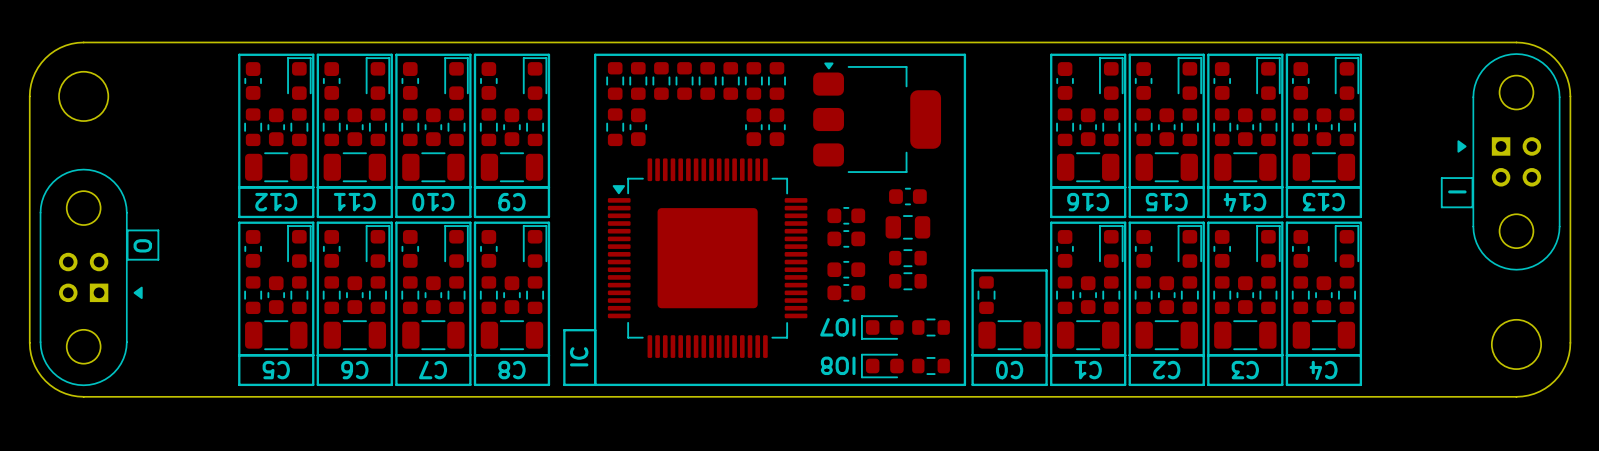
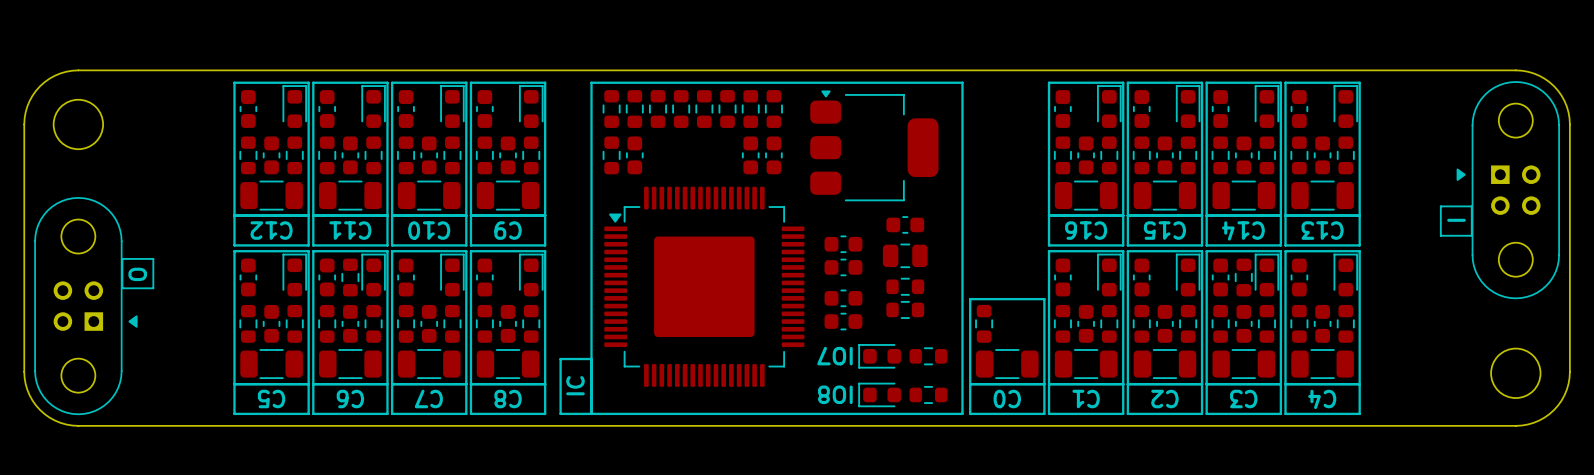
part: none -> (350, 277)
part: none -> (1243, 277)

